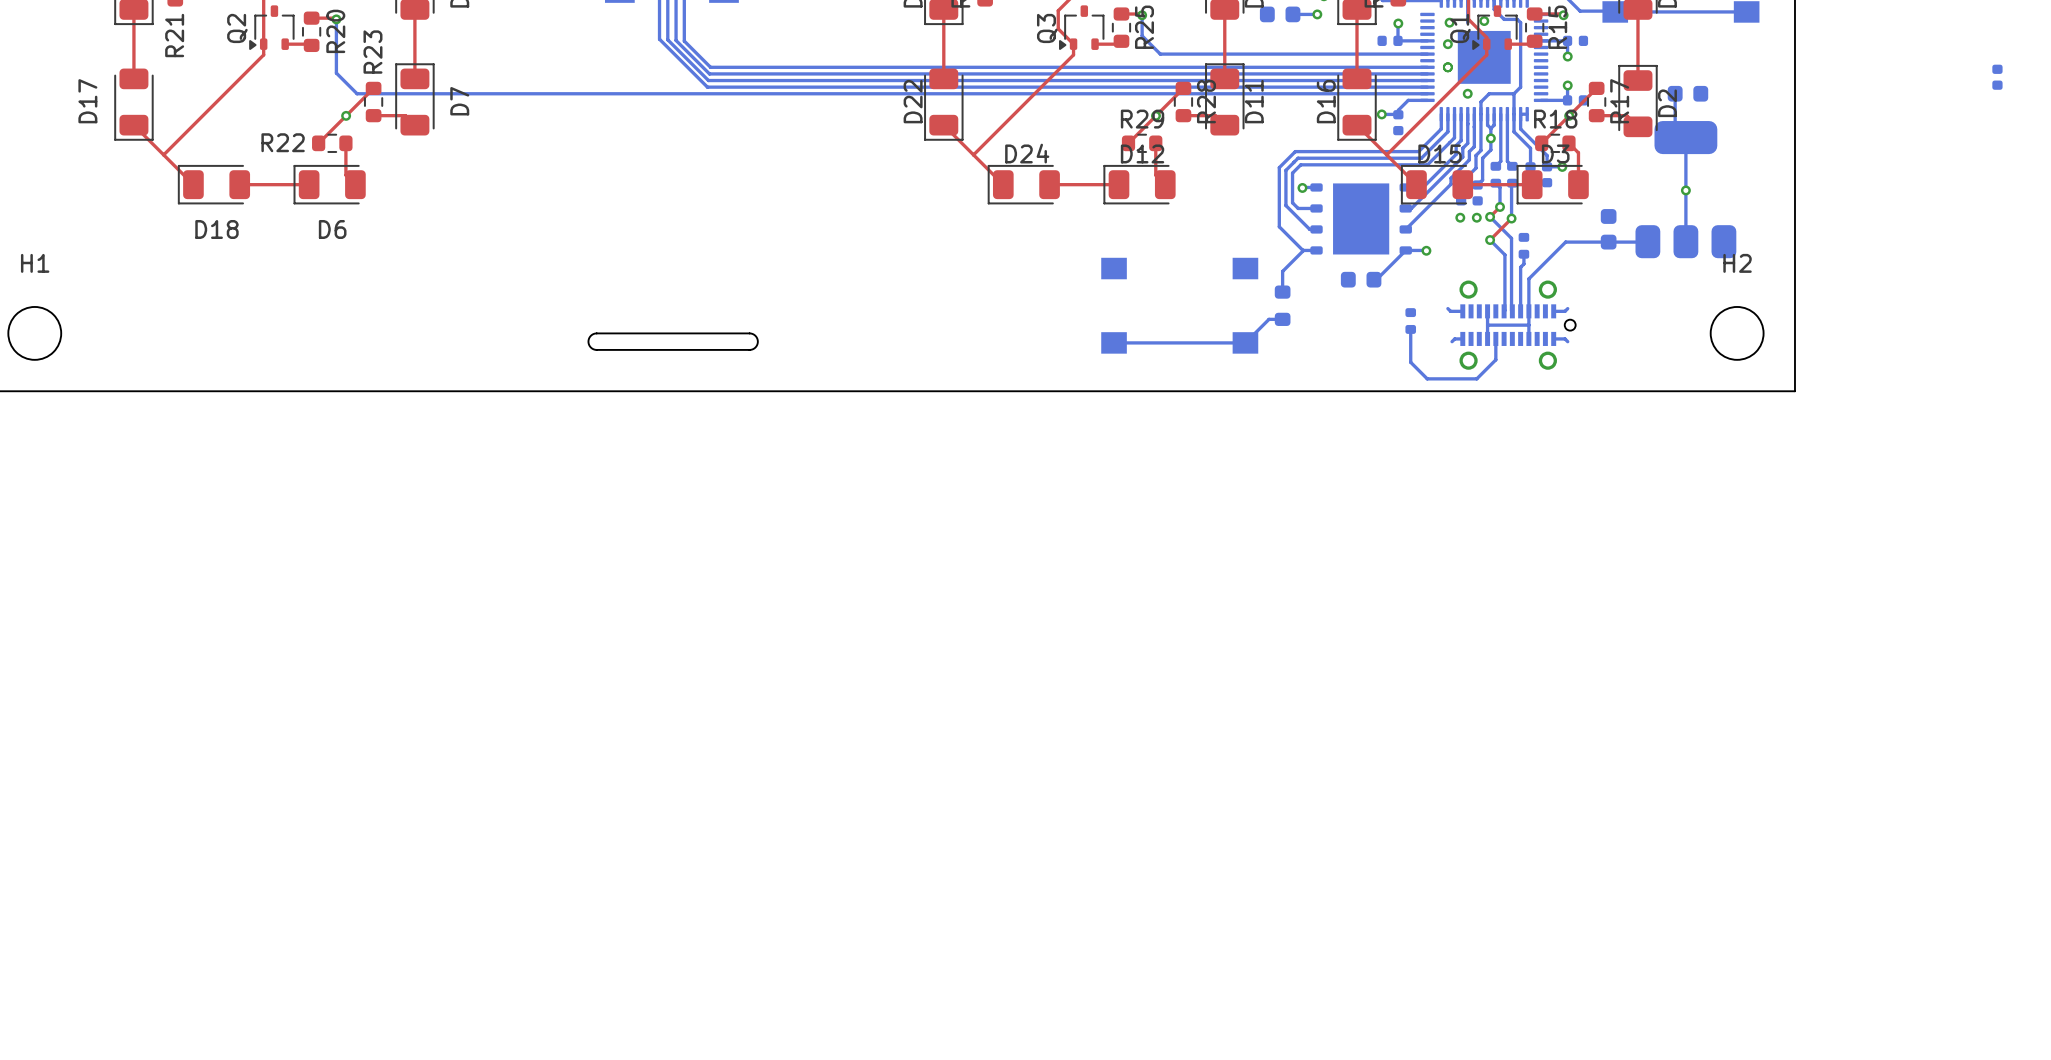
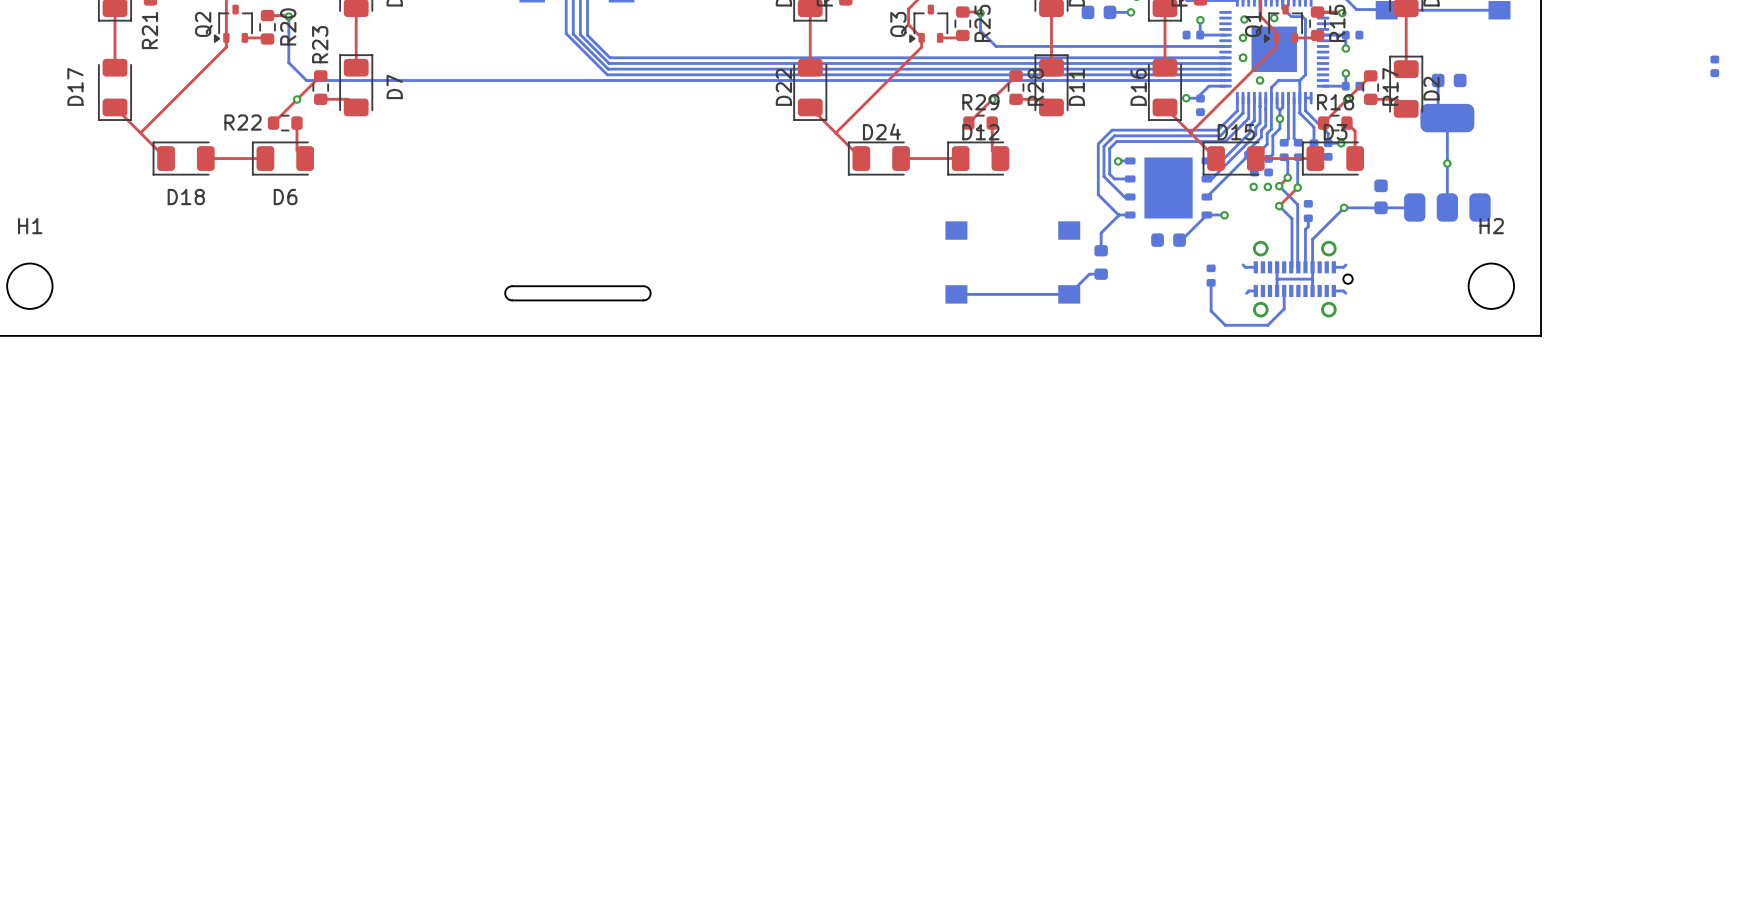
via: none -> (1344, 207)

